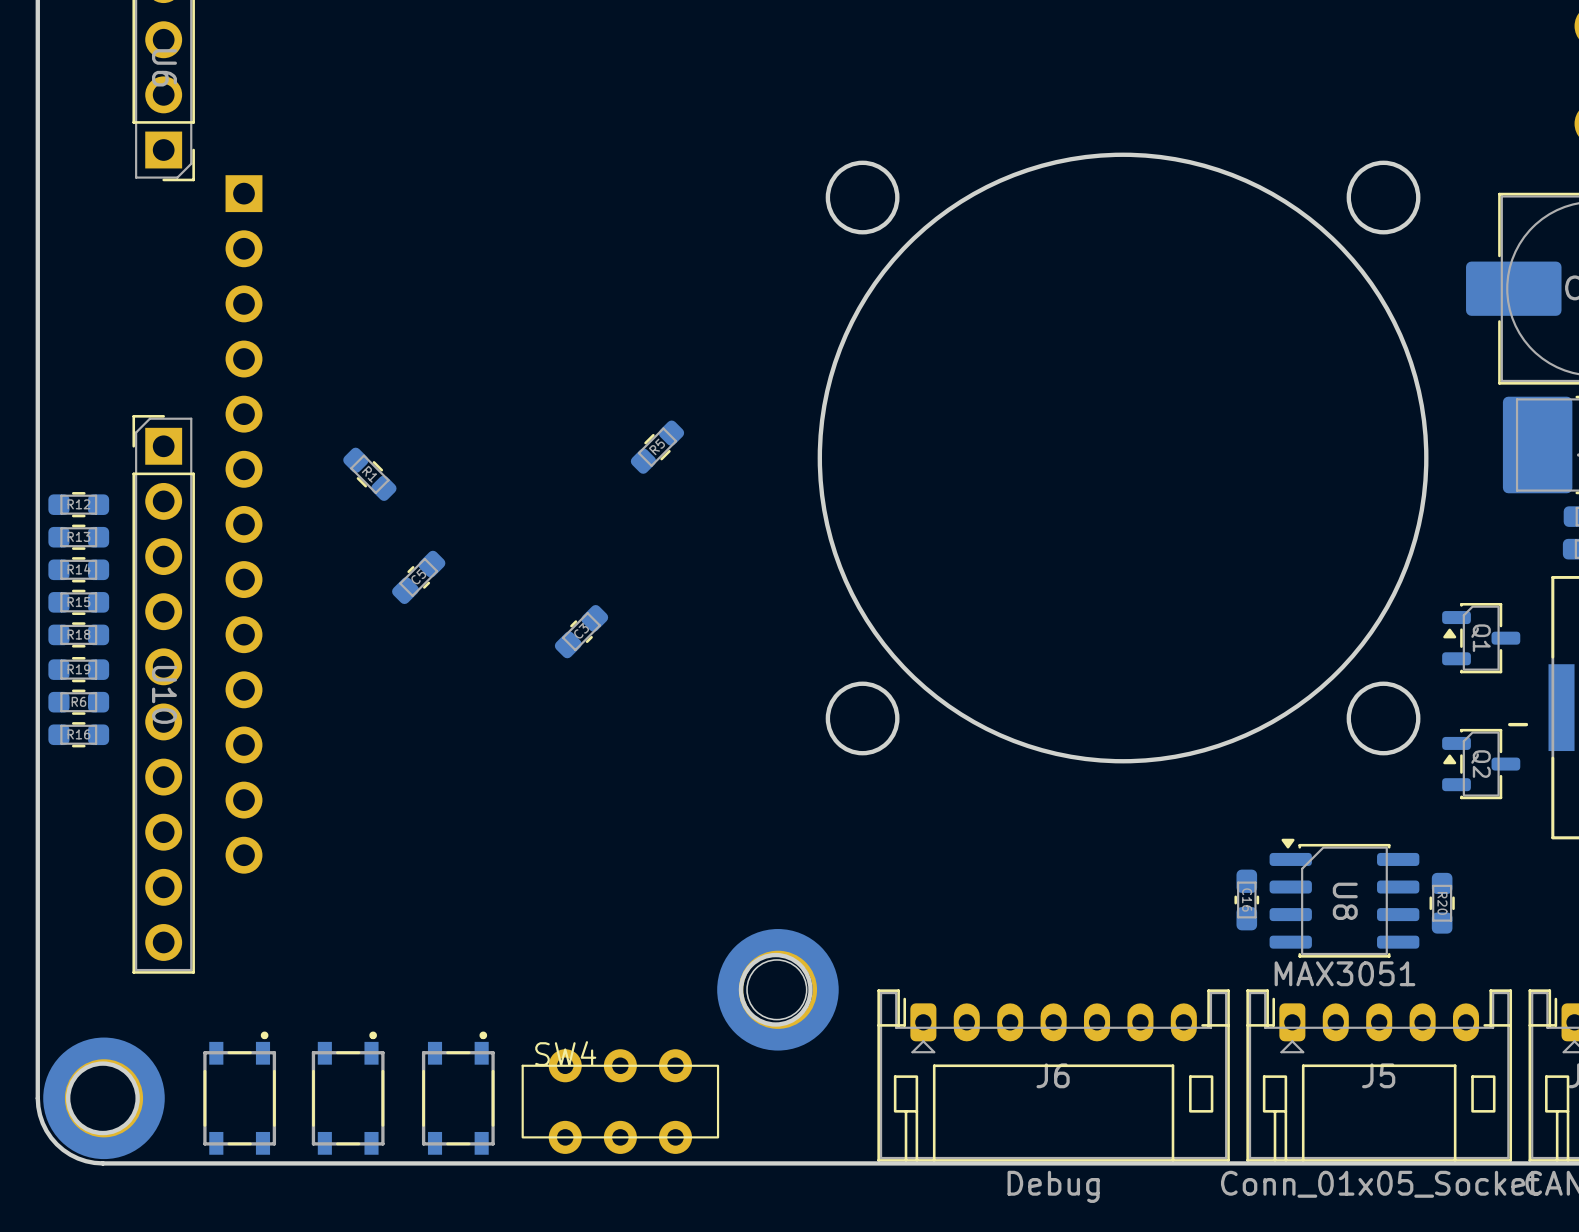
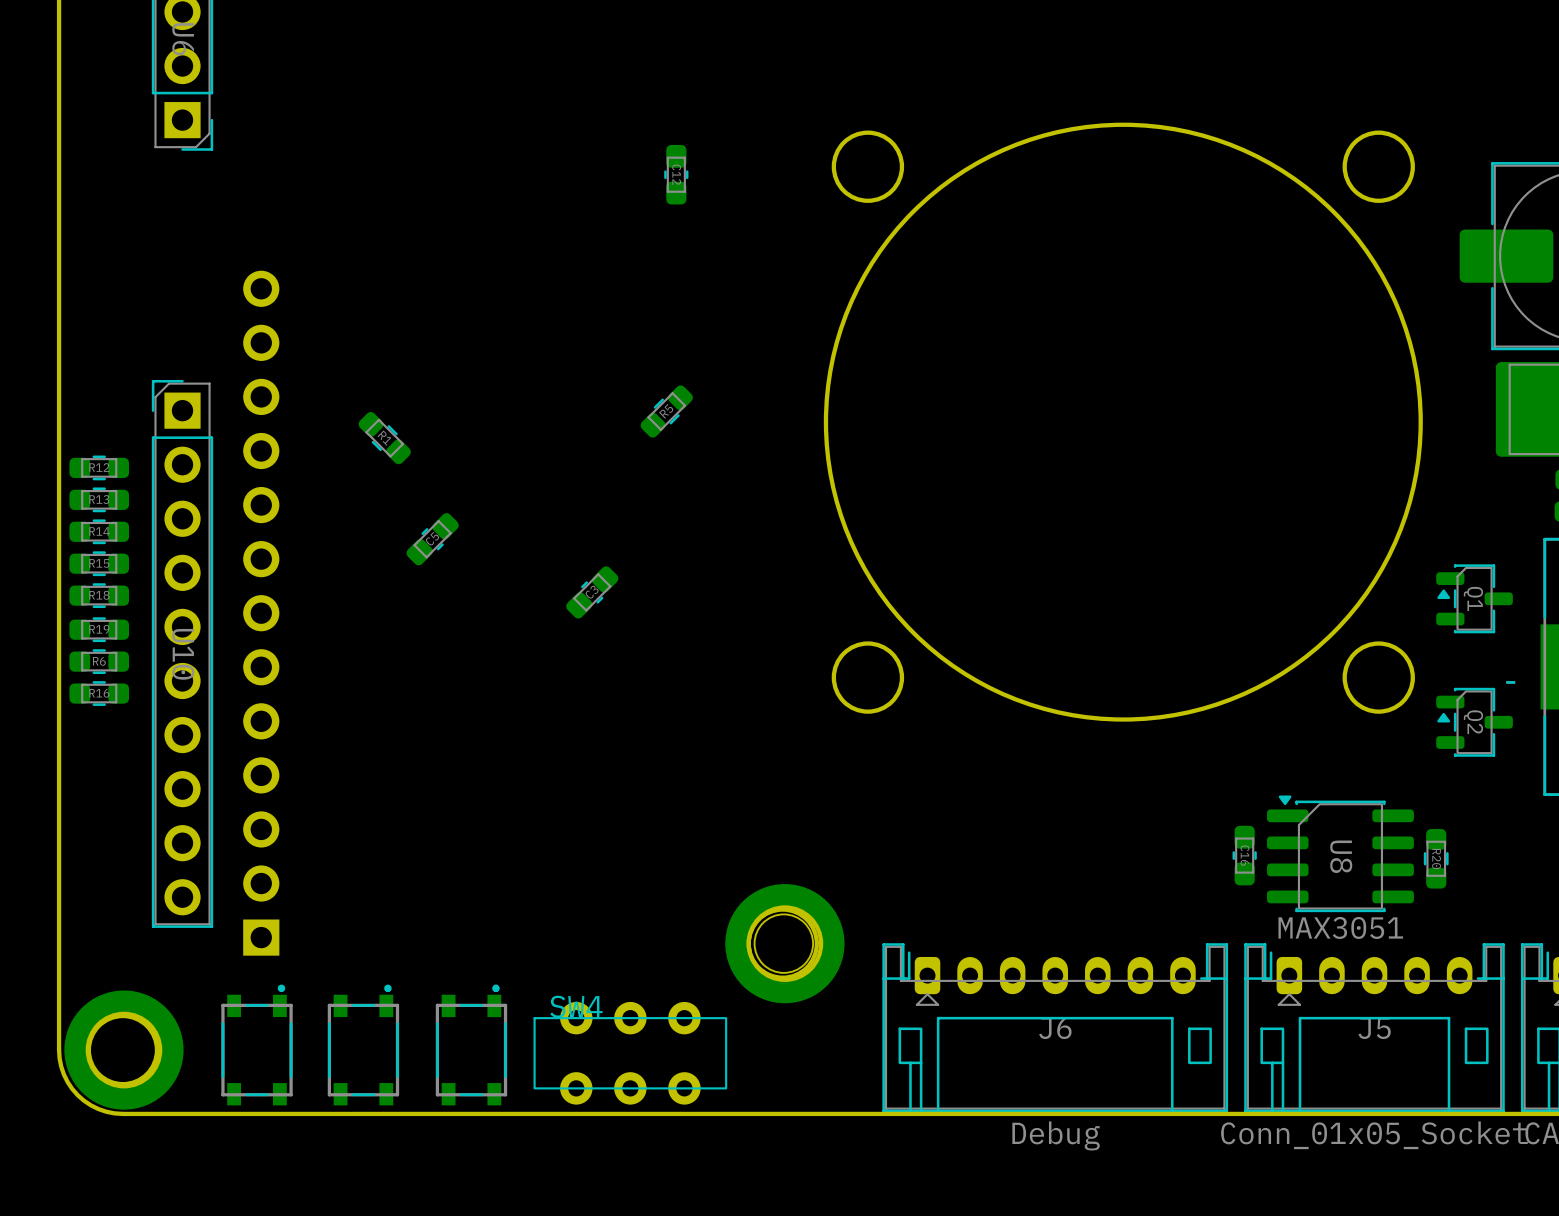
C12: none -> (676, 174)
part rotation: 0° (243, 524) -> 180° (261, 613)

